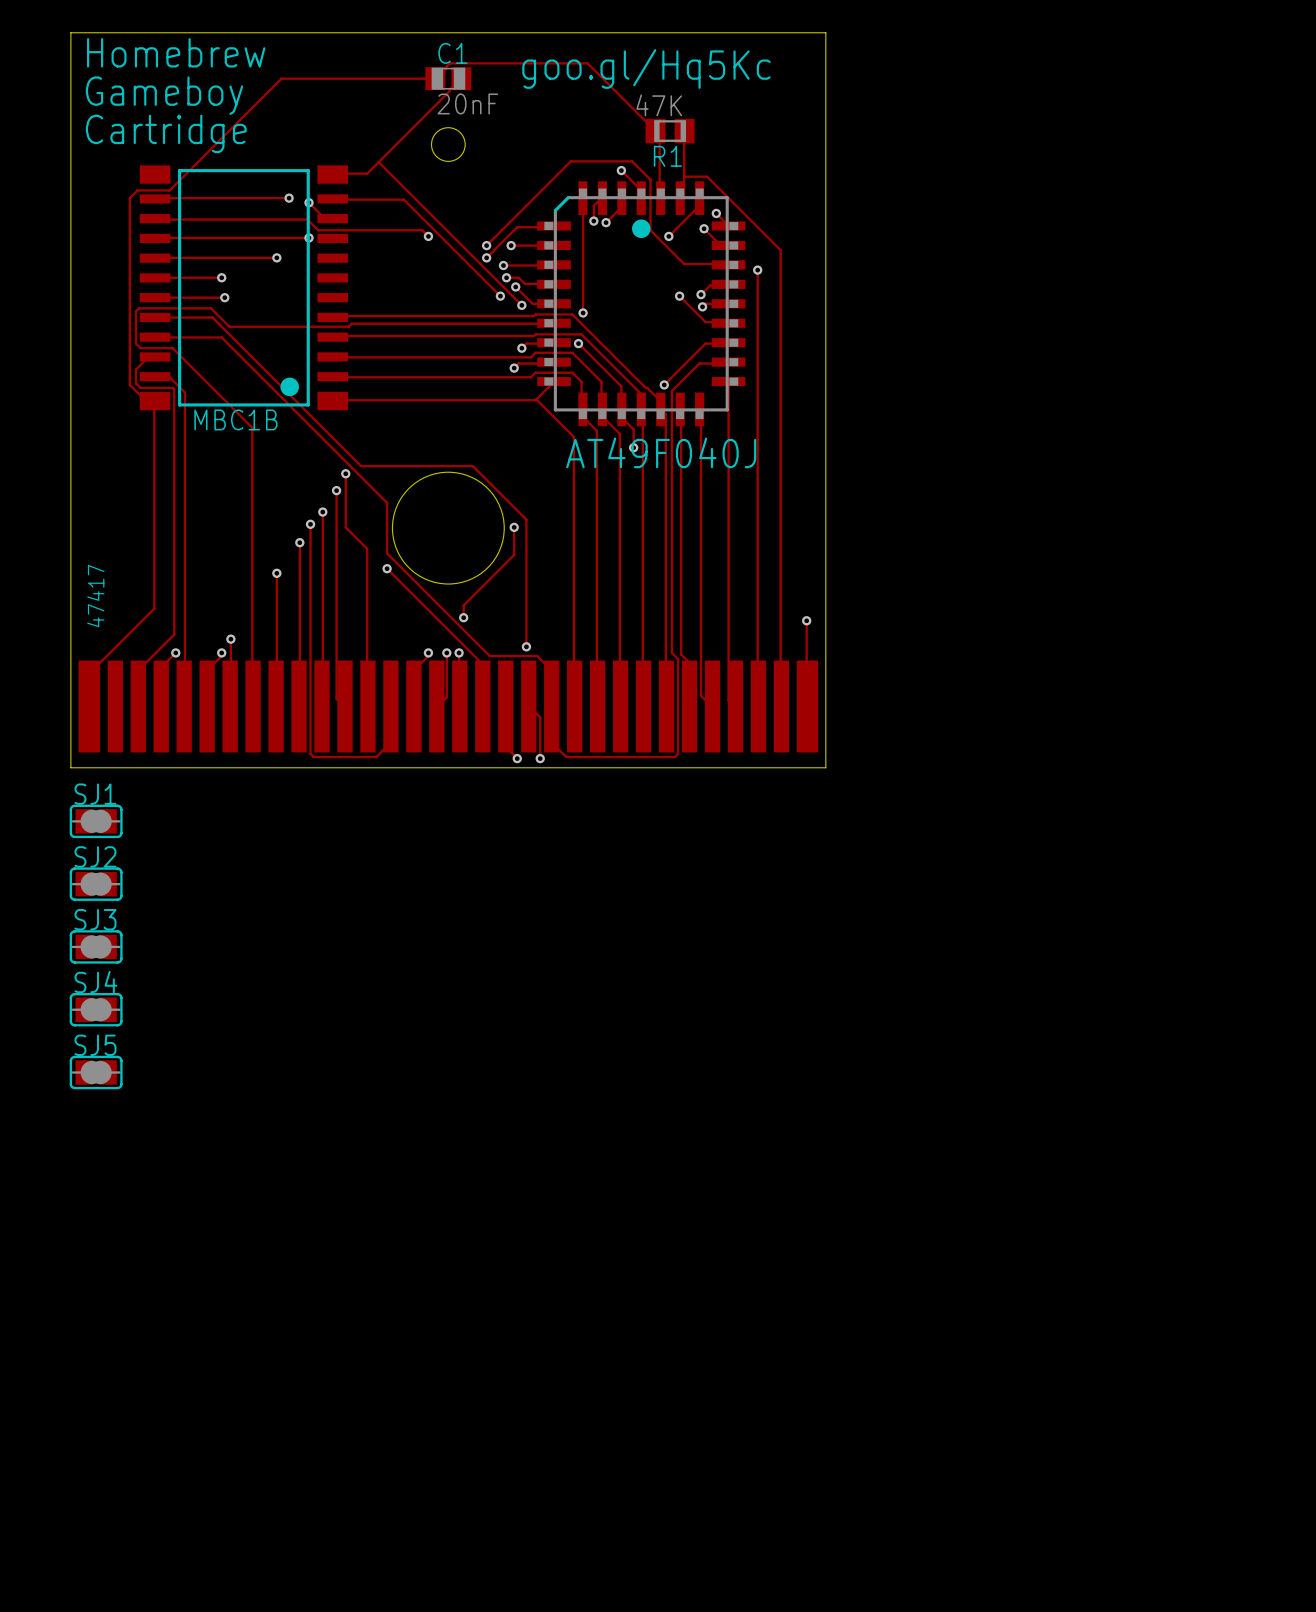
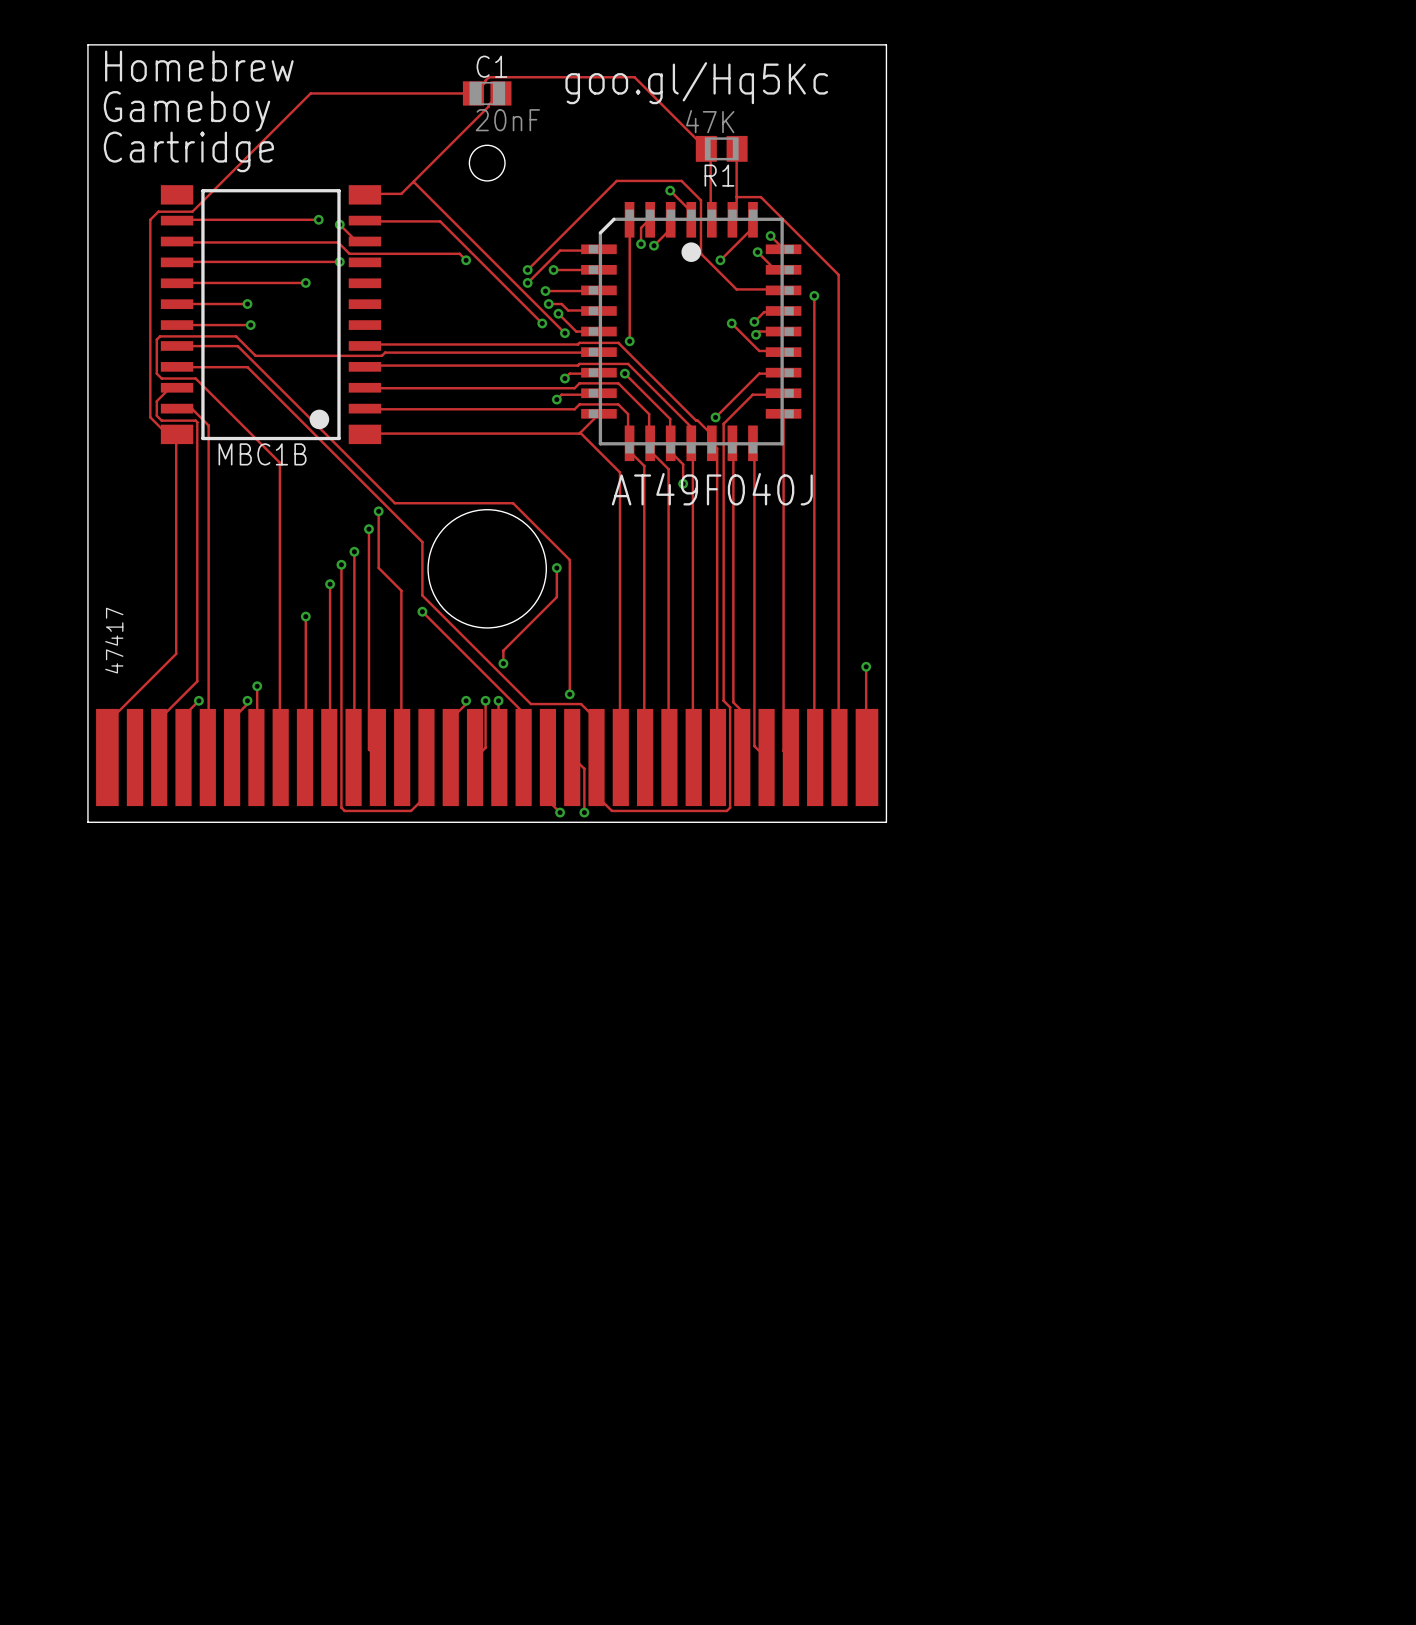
SJ1: (96, 821) -> none
SJ2: (96, 884) -> none
SJ3: (96, 946) -> none
SJ4: (96, 1009) -> none
SJ5: (96, 1072) -> none

